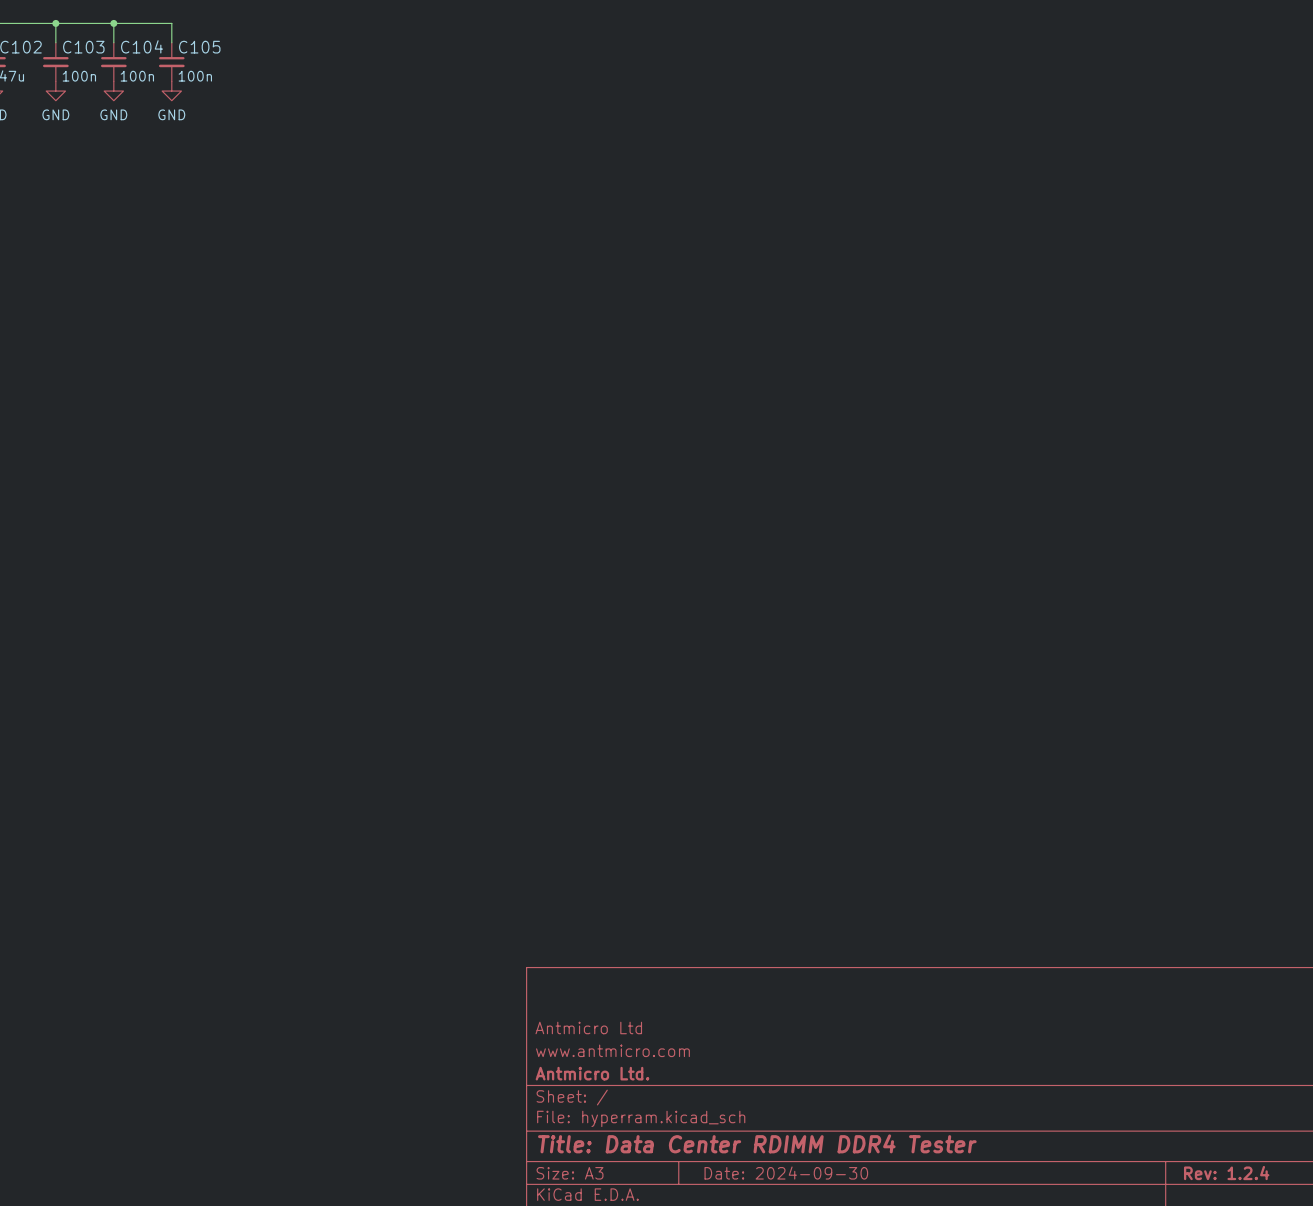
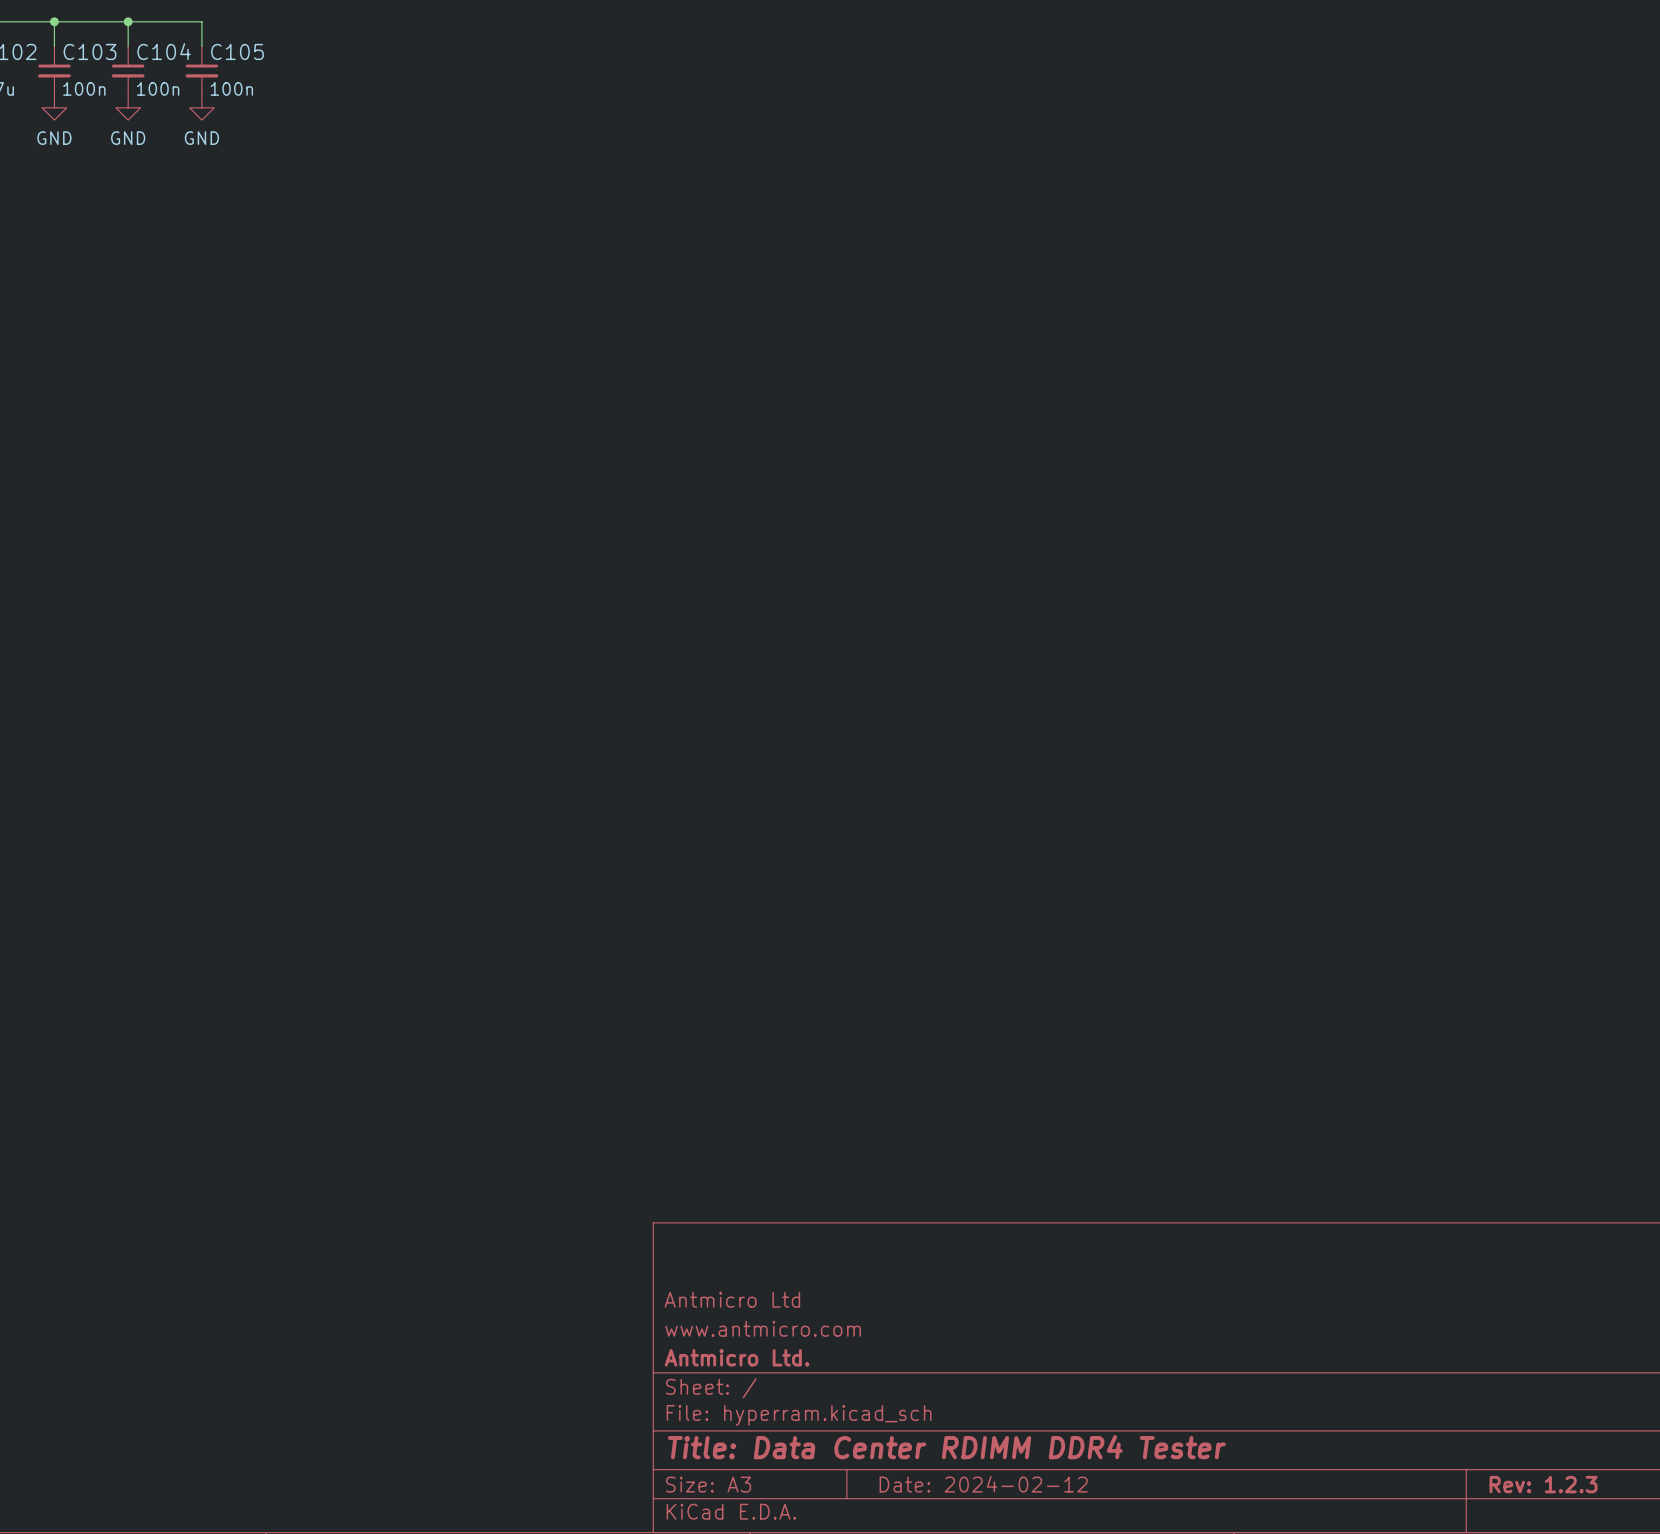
title block: Date: 2024-09-30 (786, 1173) -> Date: 2024-02-12 (983, 1484)
title block: Rev: 1.2.4 (1226, 1173) -> Rev: 1.2.3 (1543, 1484)

